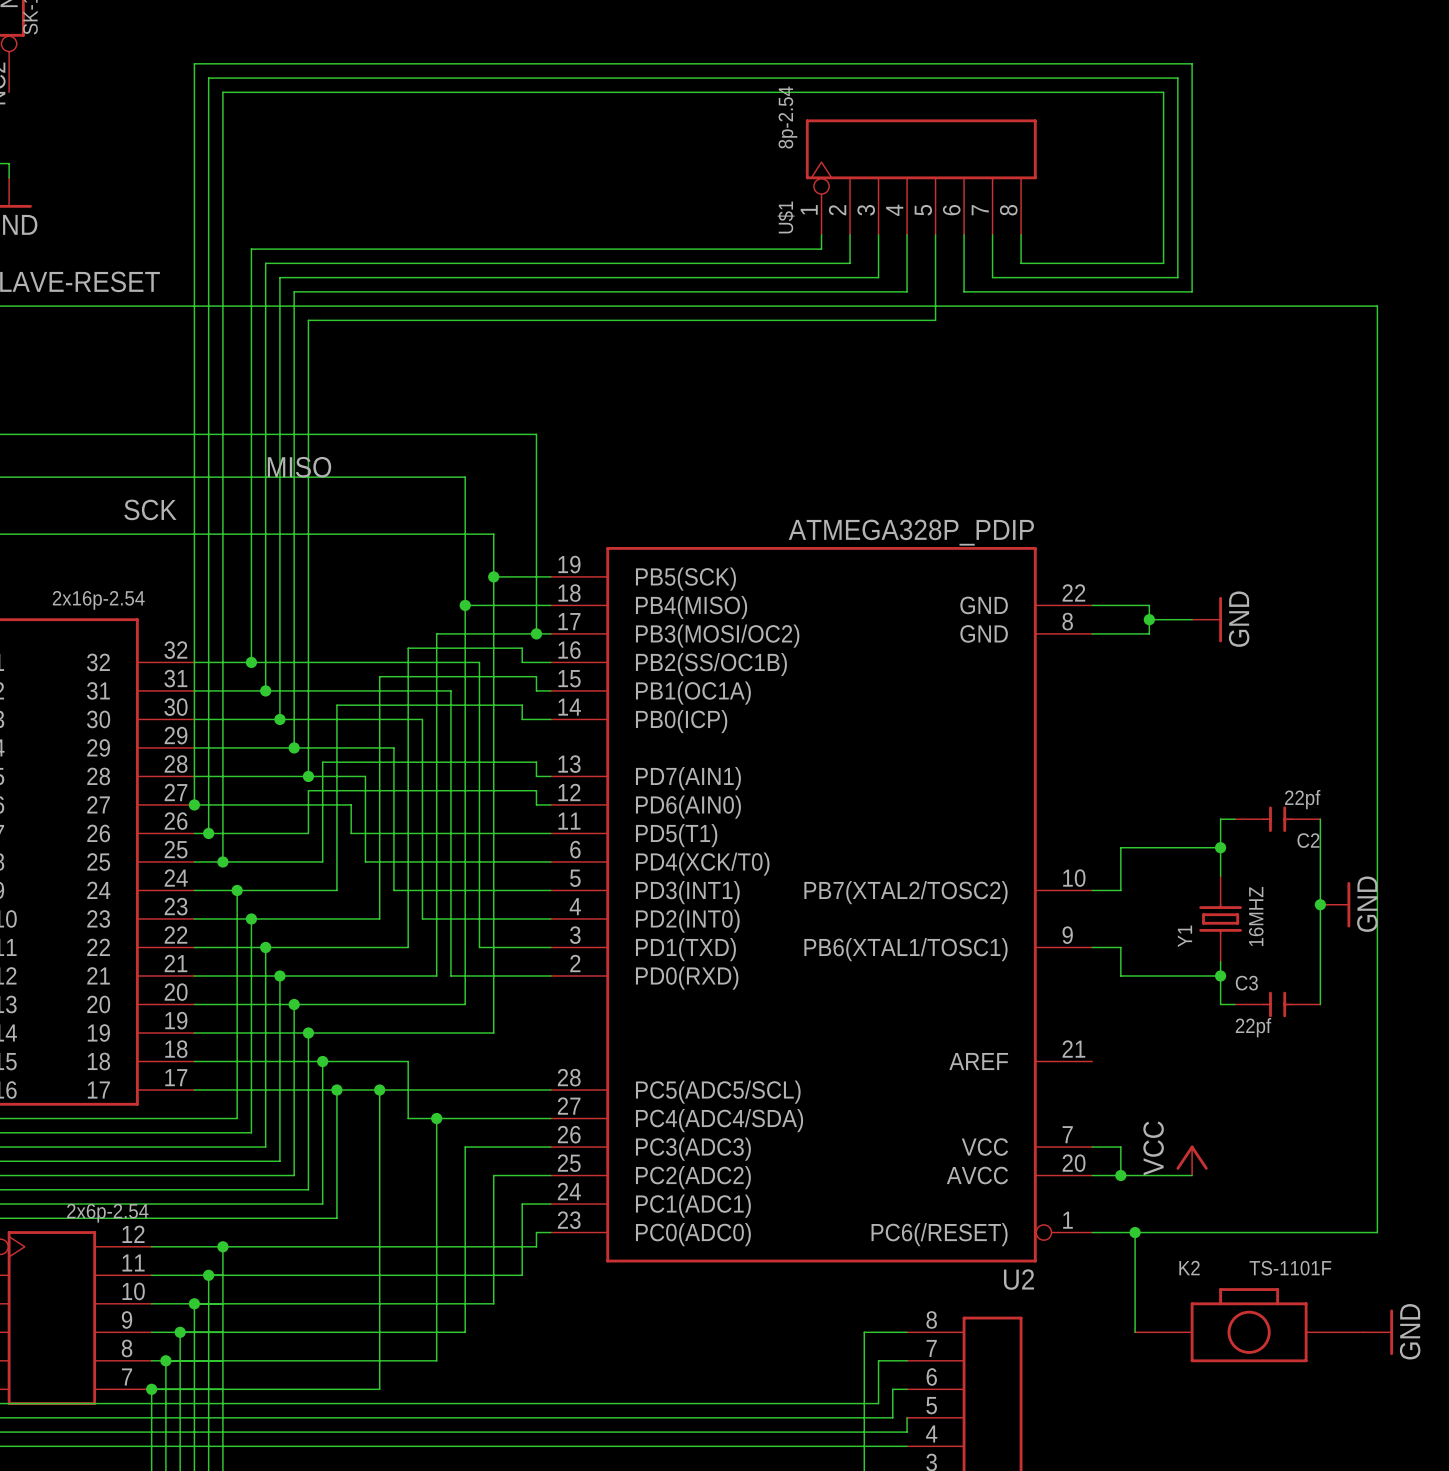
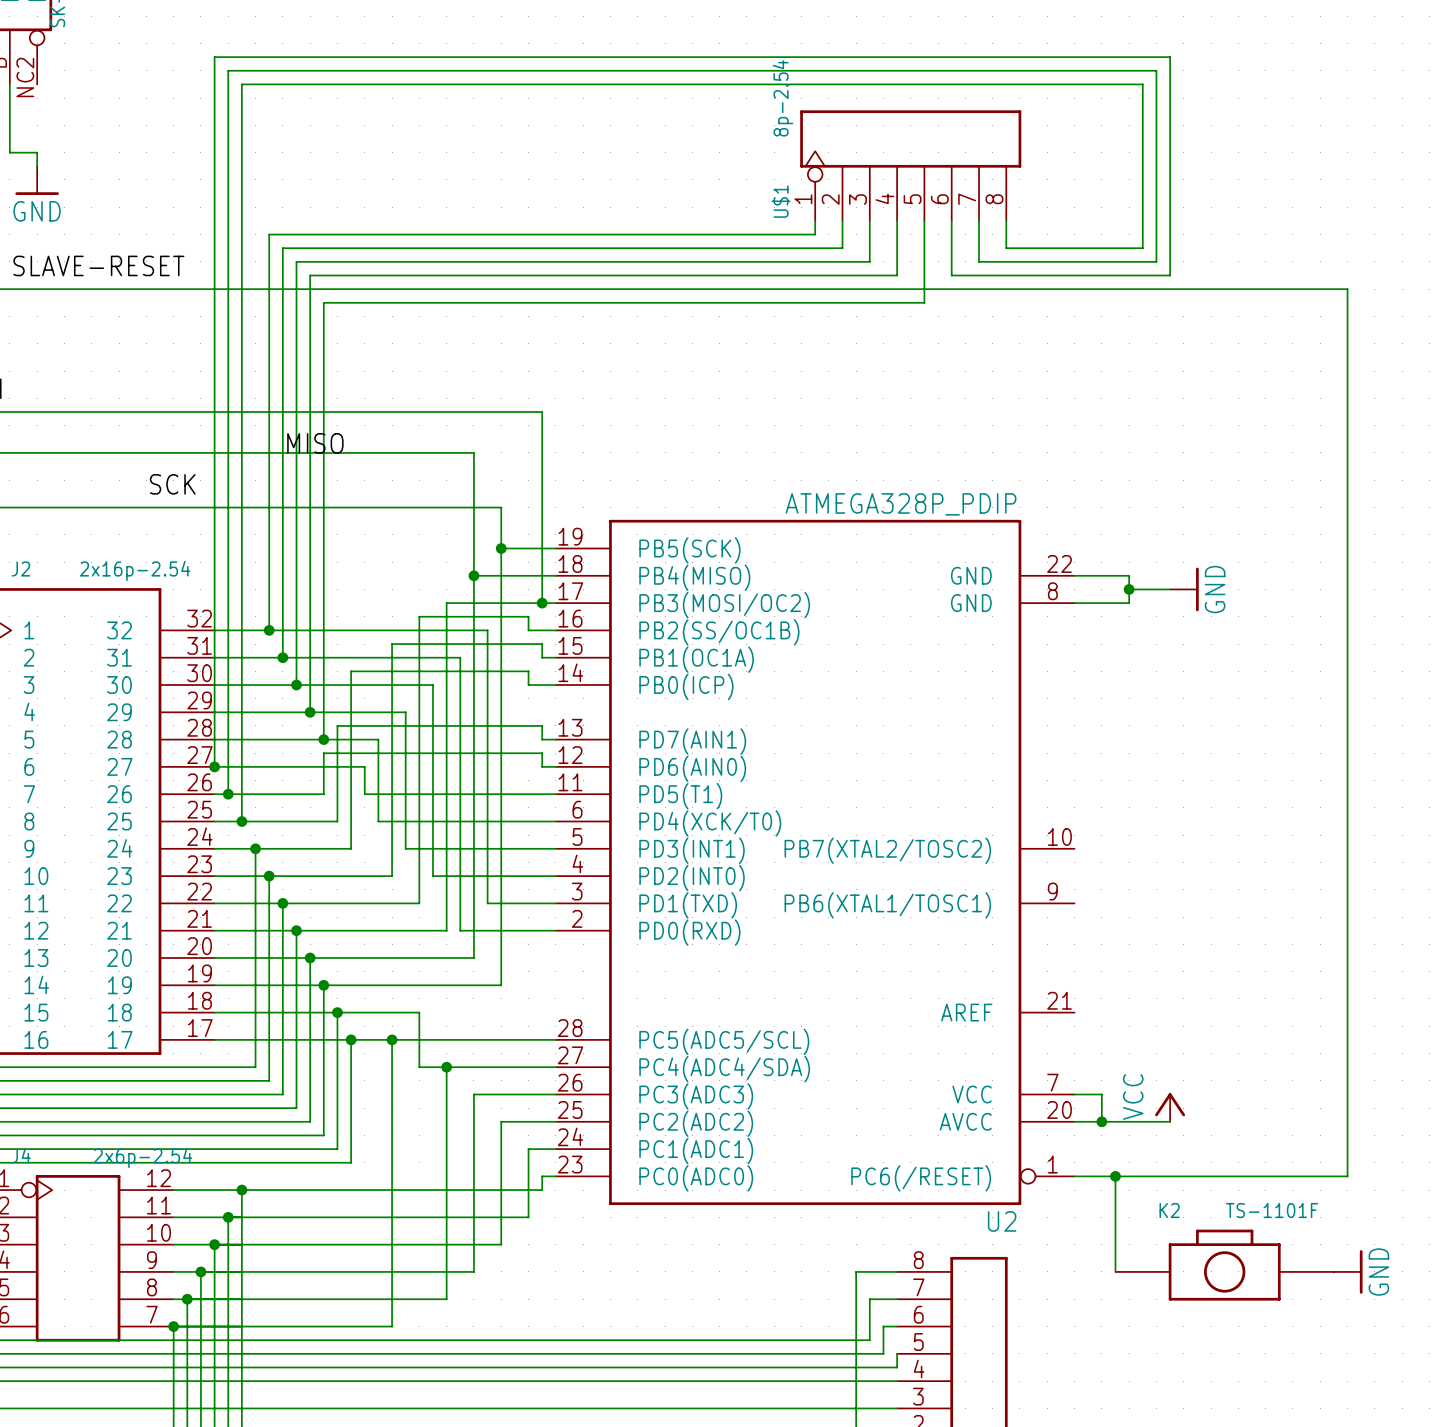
wire: (1234, 819) (1220, 819) (1220, 876) -> none
C2: 22pf (1277, 819) -> none
wire: (1320, 819) (1320, 1004) -> none
wire: (1220, 847) (1120, 847) (1120, 890) (1092, 890) -> none
junction: (1220, 847) -> none
junction: (1320, 904) -> none
power symbol: GND (1335, 904) -> none
Y1: 16MHZ (1220, 918) -> none
wire: (1092, 947) (1120, 947) (1120, 975) (1220, 975) -> none
wire: (1220, 961) (1220, 1004) (1234, 1004) -> none
junction: (1220, 975) -> none
C3: 22pf (1277, 1004) -> none

